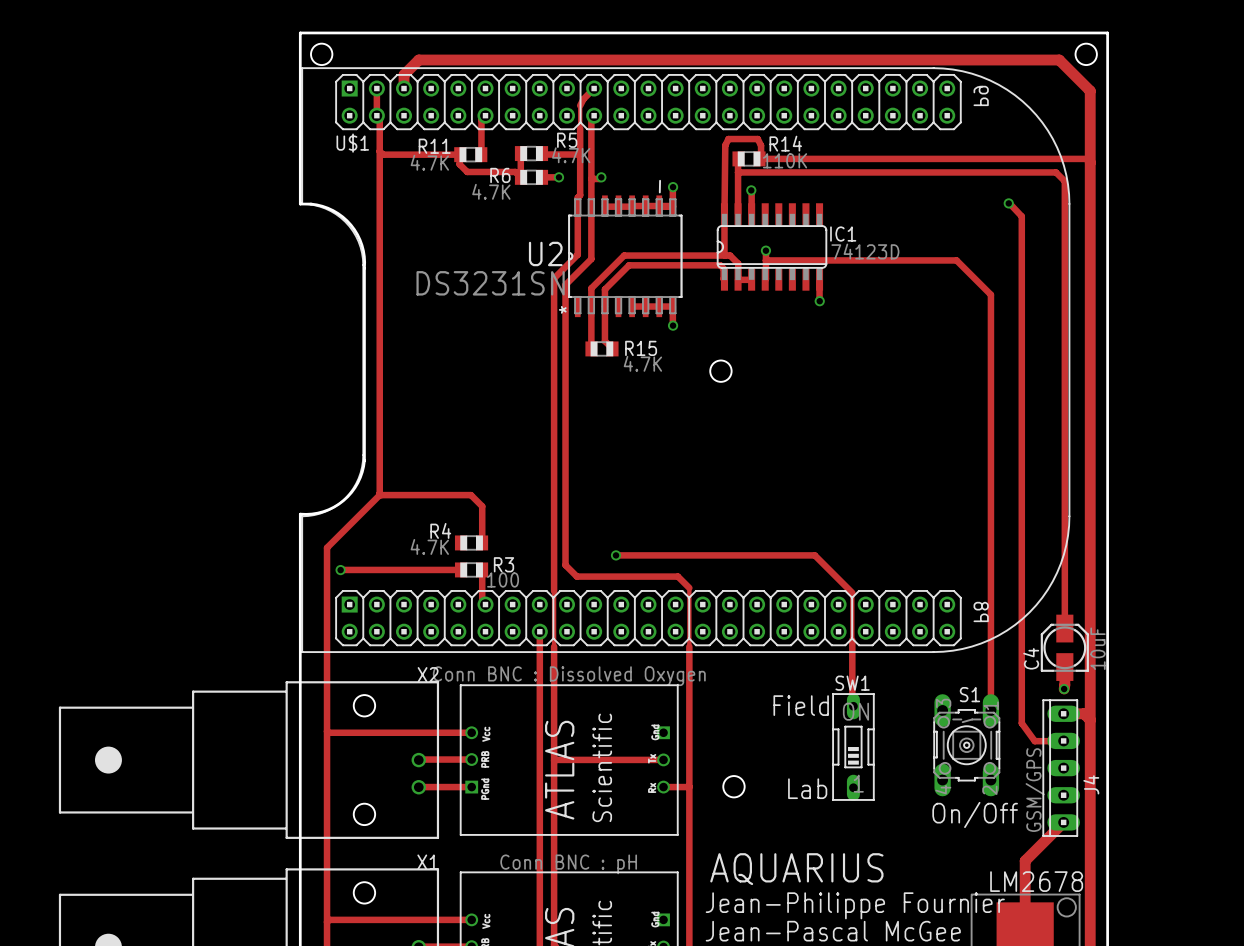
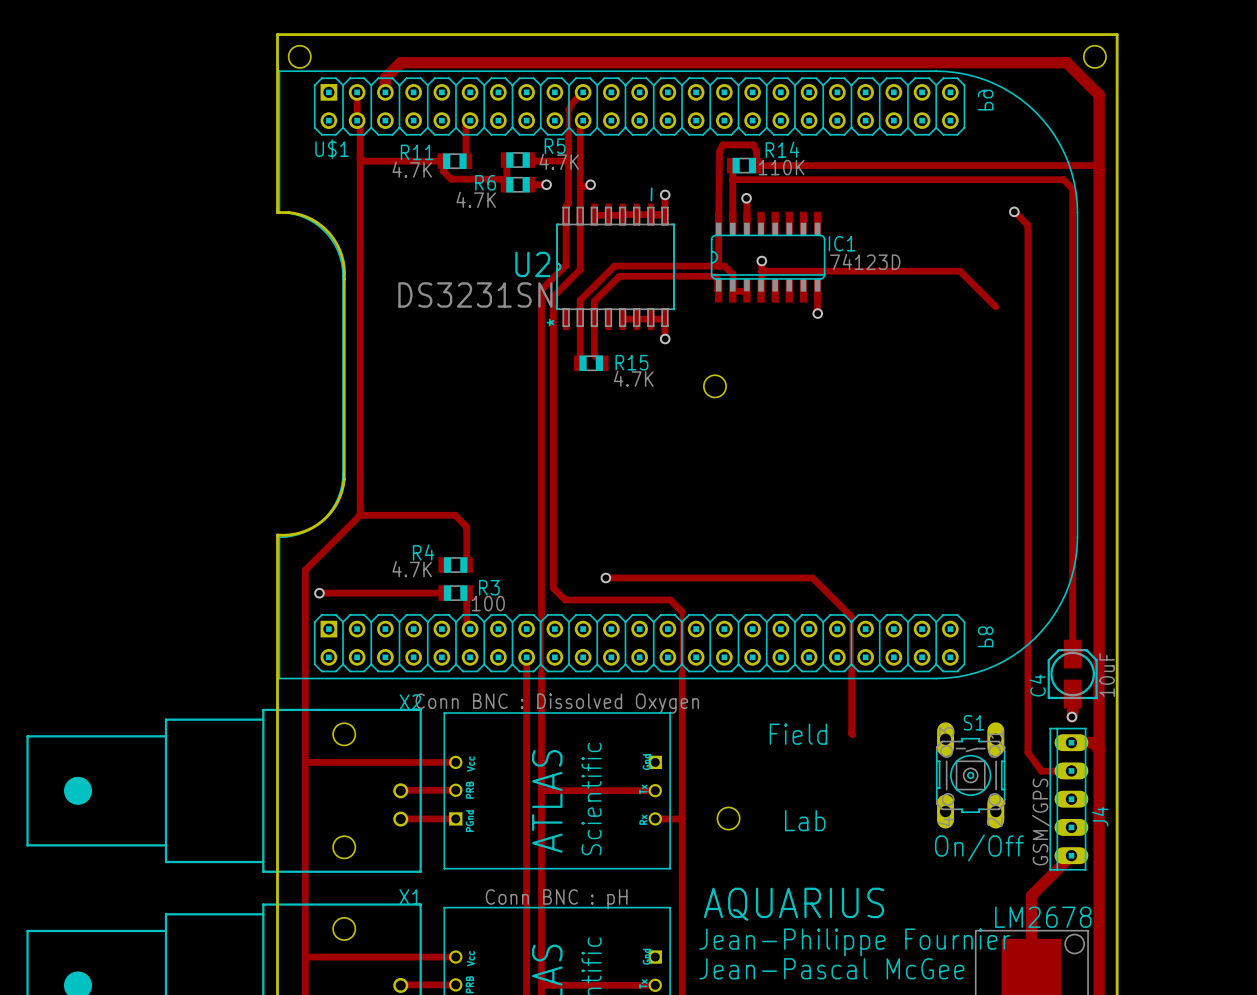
track: (990, 294) (990, 710) -> none
SW1: (853, 747) -> none

